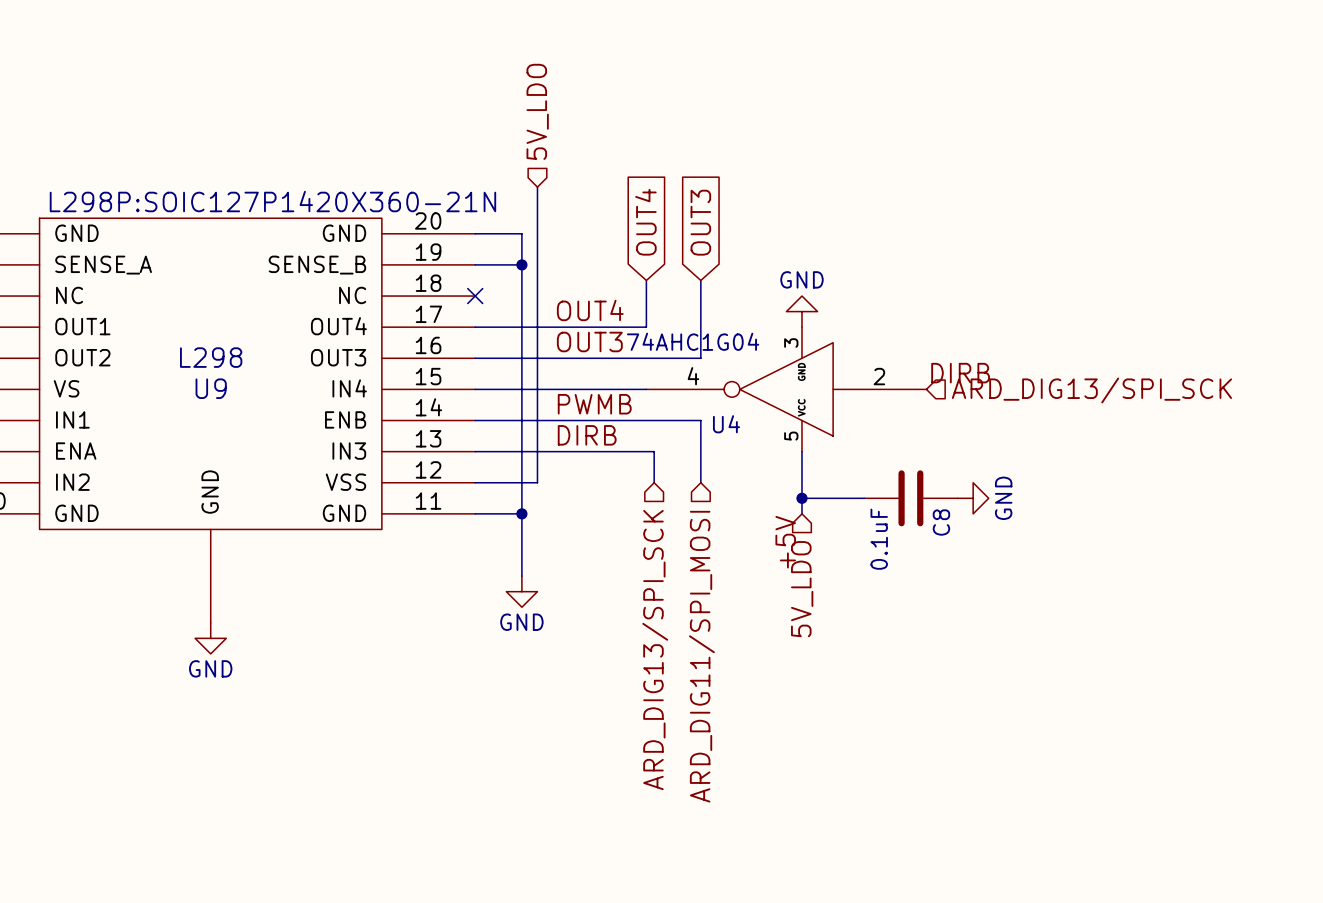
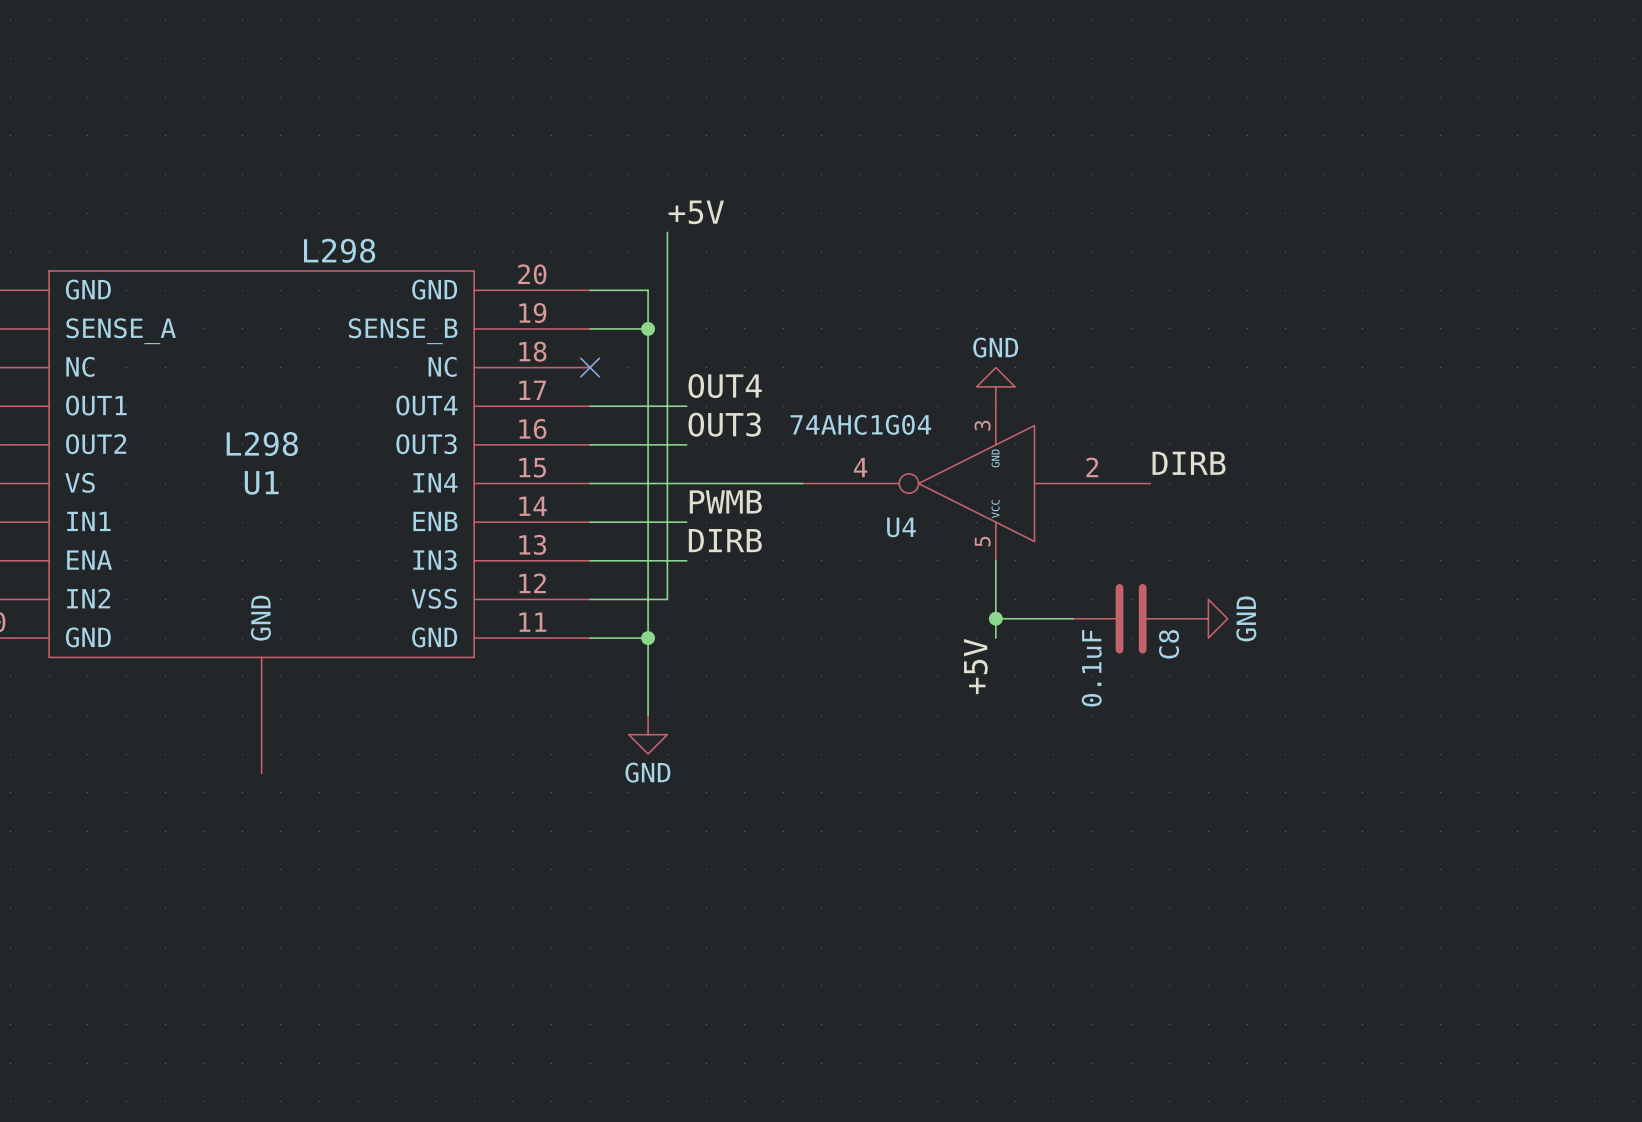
hierarchical label: 5V_LDO (537, 111) -> none
label: none -> +5V (696, 212)
U9 text: L298P:SOIC127P1420X360-21N (272, 201) -> L298 (339, 250)
global label: OUT4 (645, 222) -> none
global label: OUT3 (700, 222) -> none
wire: (646, 280) (646, 327) (553, 327) -> none
wire: (700, 280) (700, 358) (553, 358) -> none
U9 name: U9 (211, 388) -> U1 (261, 482)
hierarchical label: ARD_DIG13/SPI_SCK (1091, 390) -> none
wire: (553, 420) (700, 420) (700, 482) -> none
wire: (553, 451) (654, 451) (654, 482) -> none
hierarchical label: 5V_LDO (802, 589) -> none
power symbol: GND (210, 638) -> none
hierarchical label: ARD_DIG13/SPI_SCK (655, 650) -> none
hierarchical label: ARD_DIG11/SPI_MOSI (701, 656) -> none

